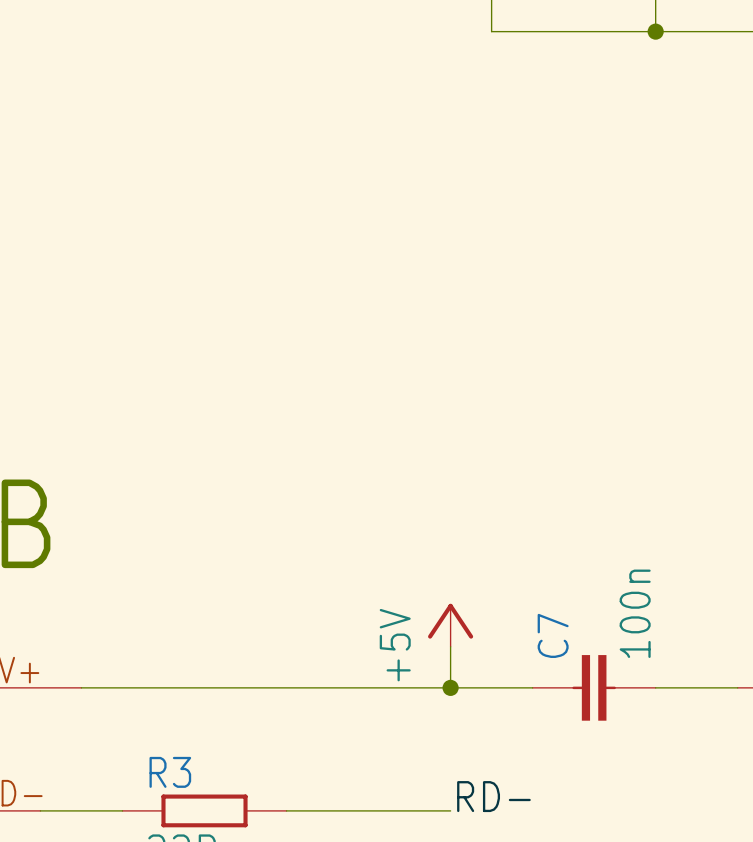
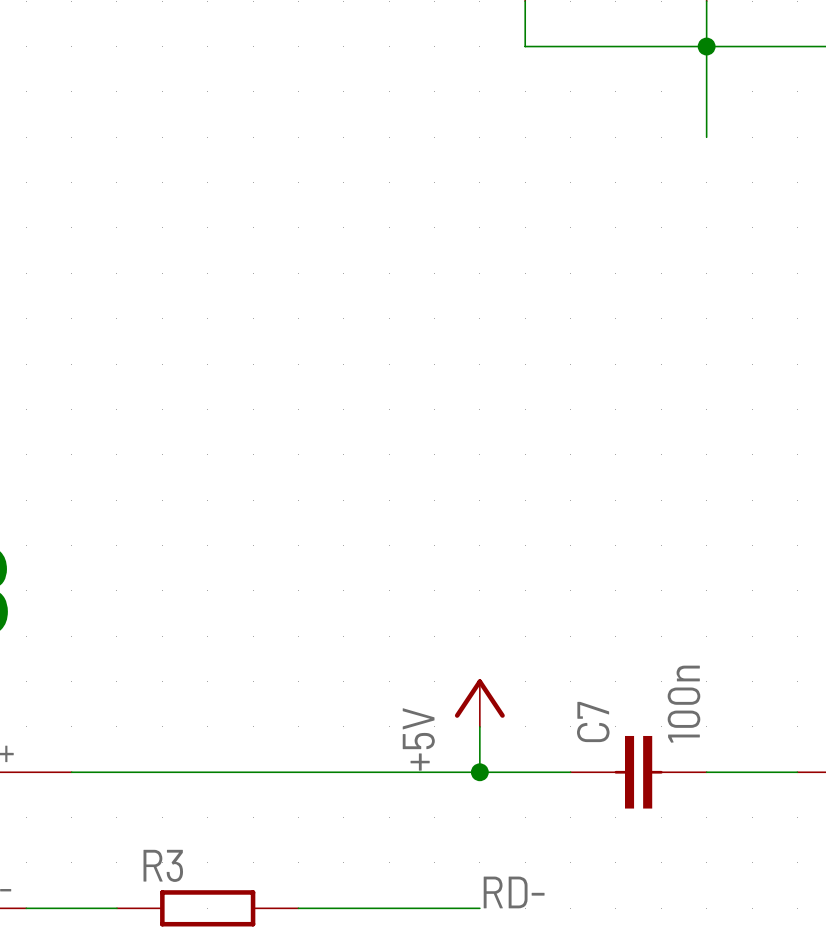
wire: none -> (706, 46) (706, 137)

